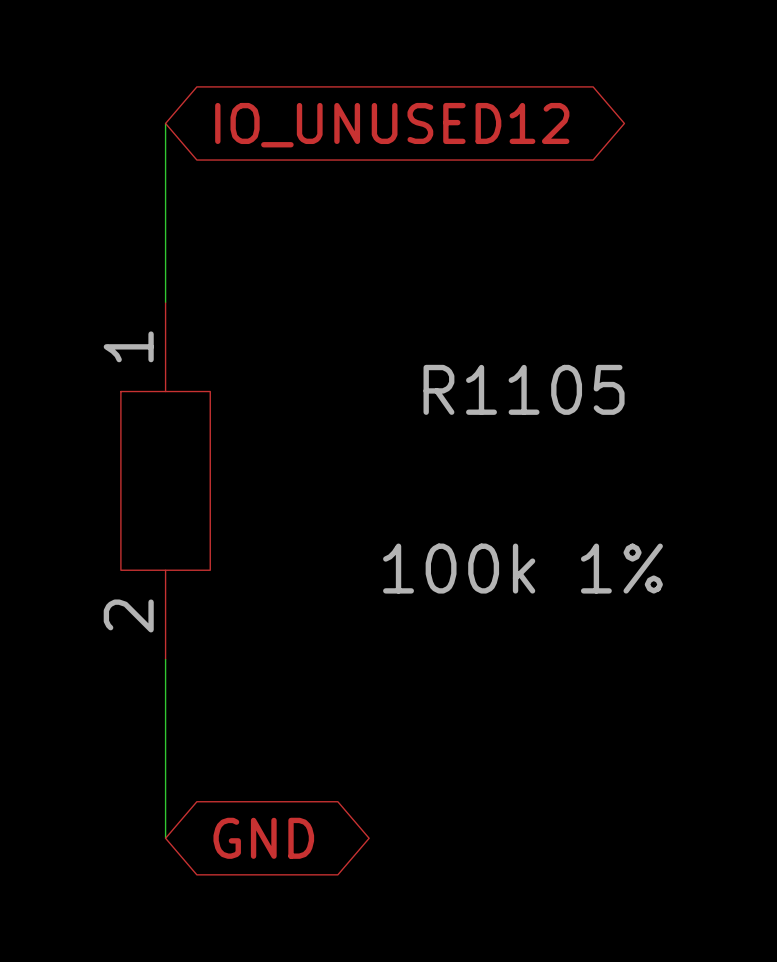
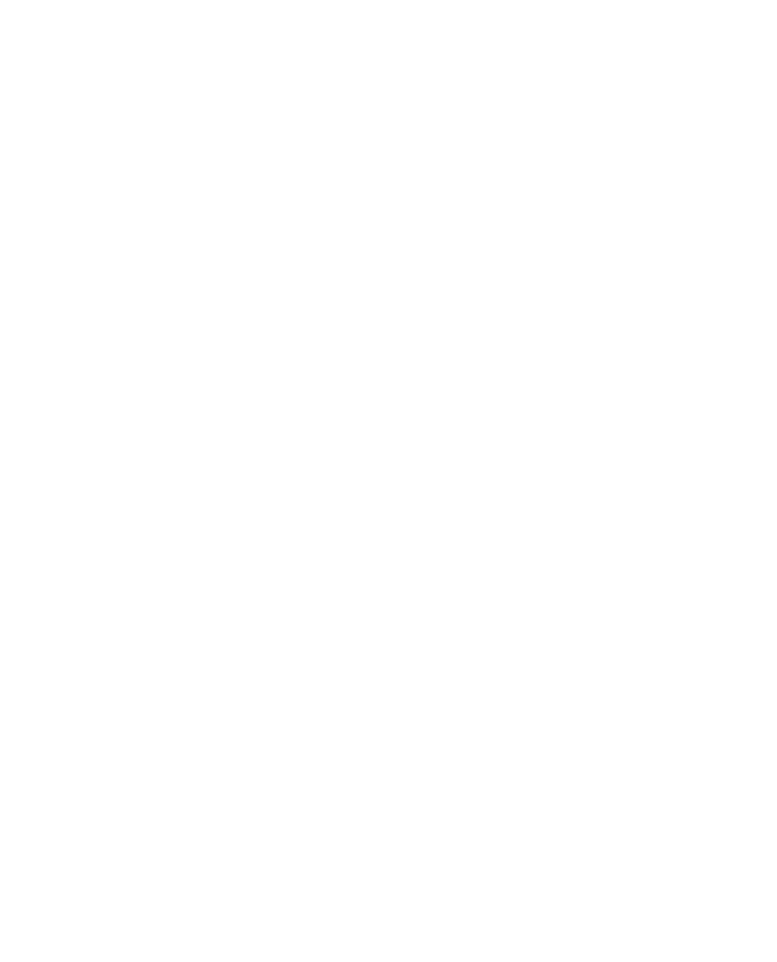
wire: (165, 123) (165, 302) -> none
global label: IO_UNUSED12 (392, 125) -> none
R1105: 100k 1% (165, 480) -> none
wire: (165, 659) (165, 838) -> none
global label: GND (263, 838) -> none

